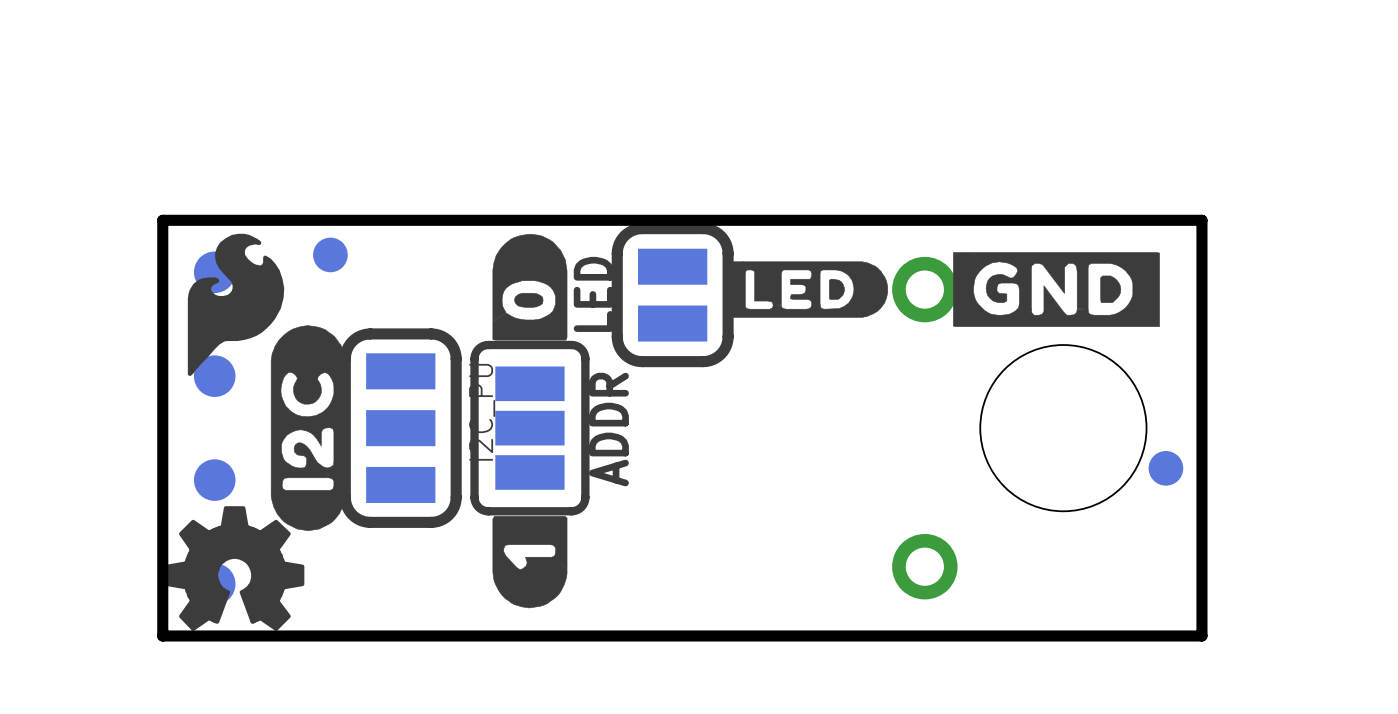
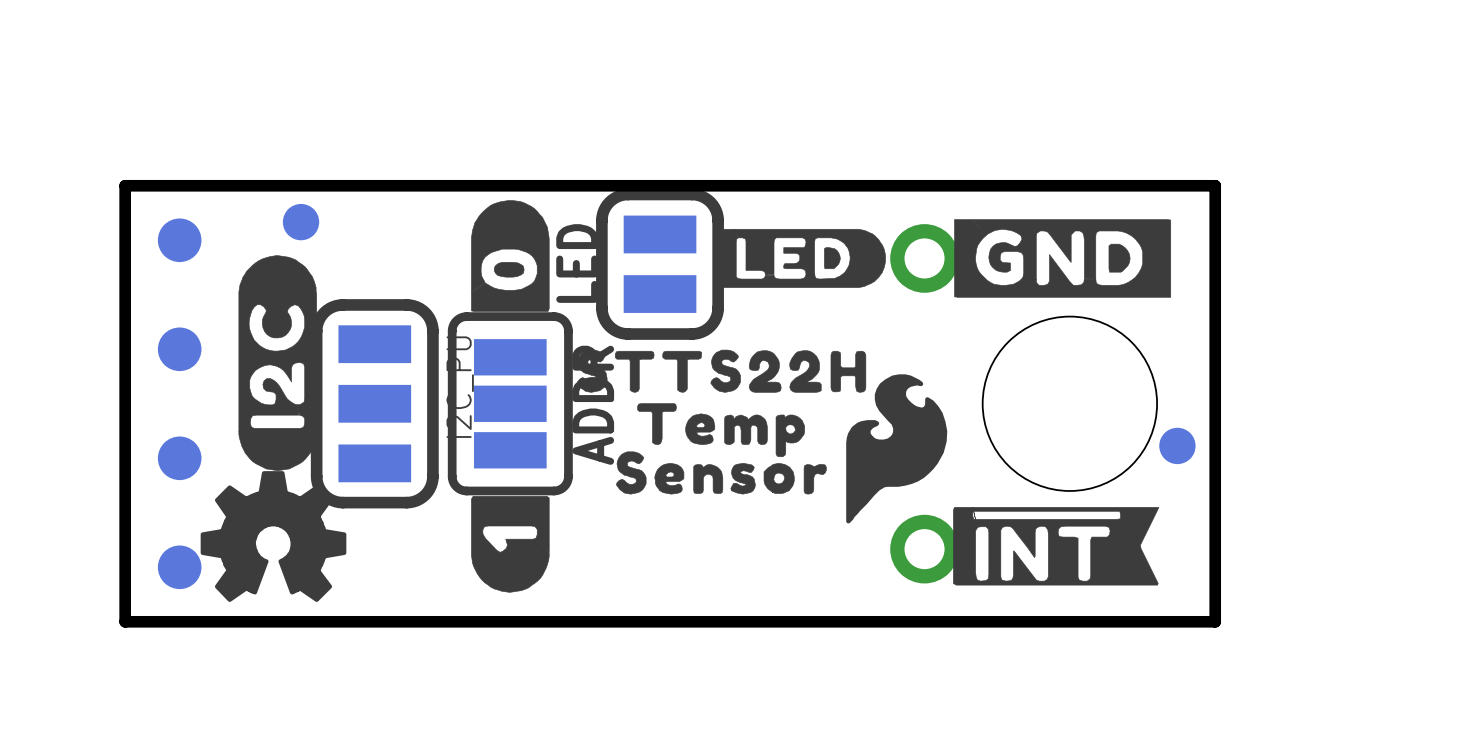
drawing position: (236, 304) -> (896, 448)
drawing: none -> [577, 349, 867, 495]
drawing position: (308, 428) -> (277, 363)
drawing: none -> [953, 507, 1160, 586]
drawing position: (234, 568) -> (273, 536)

